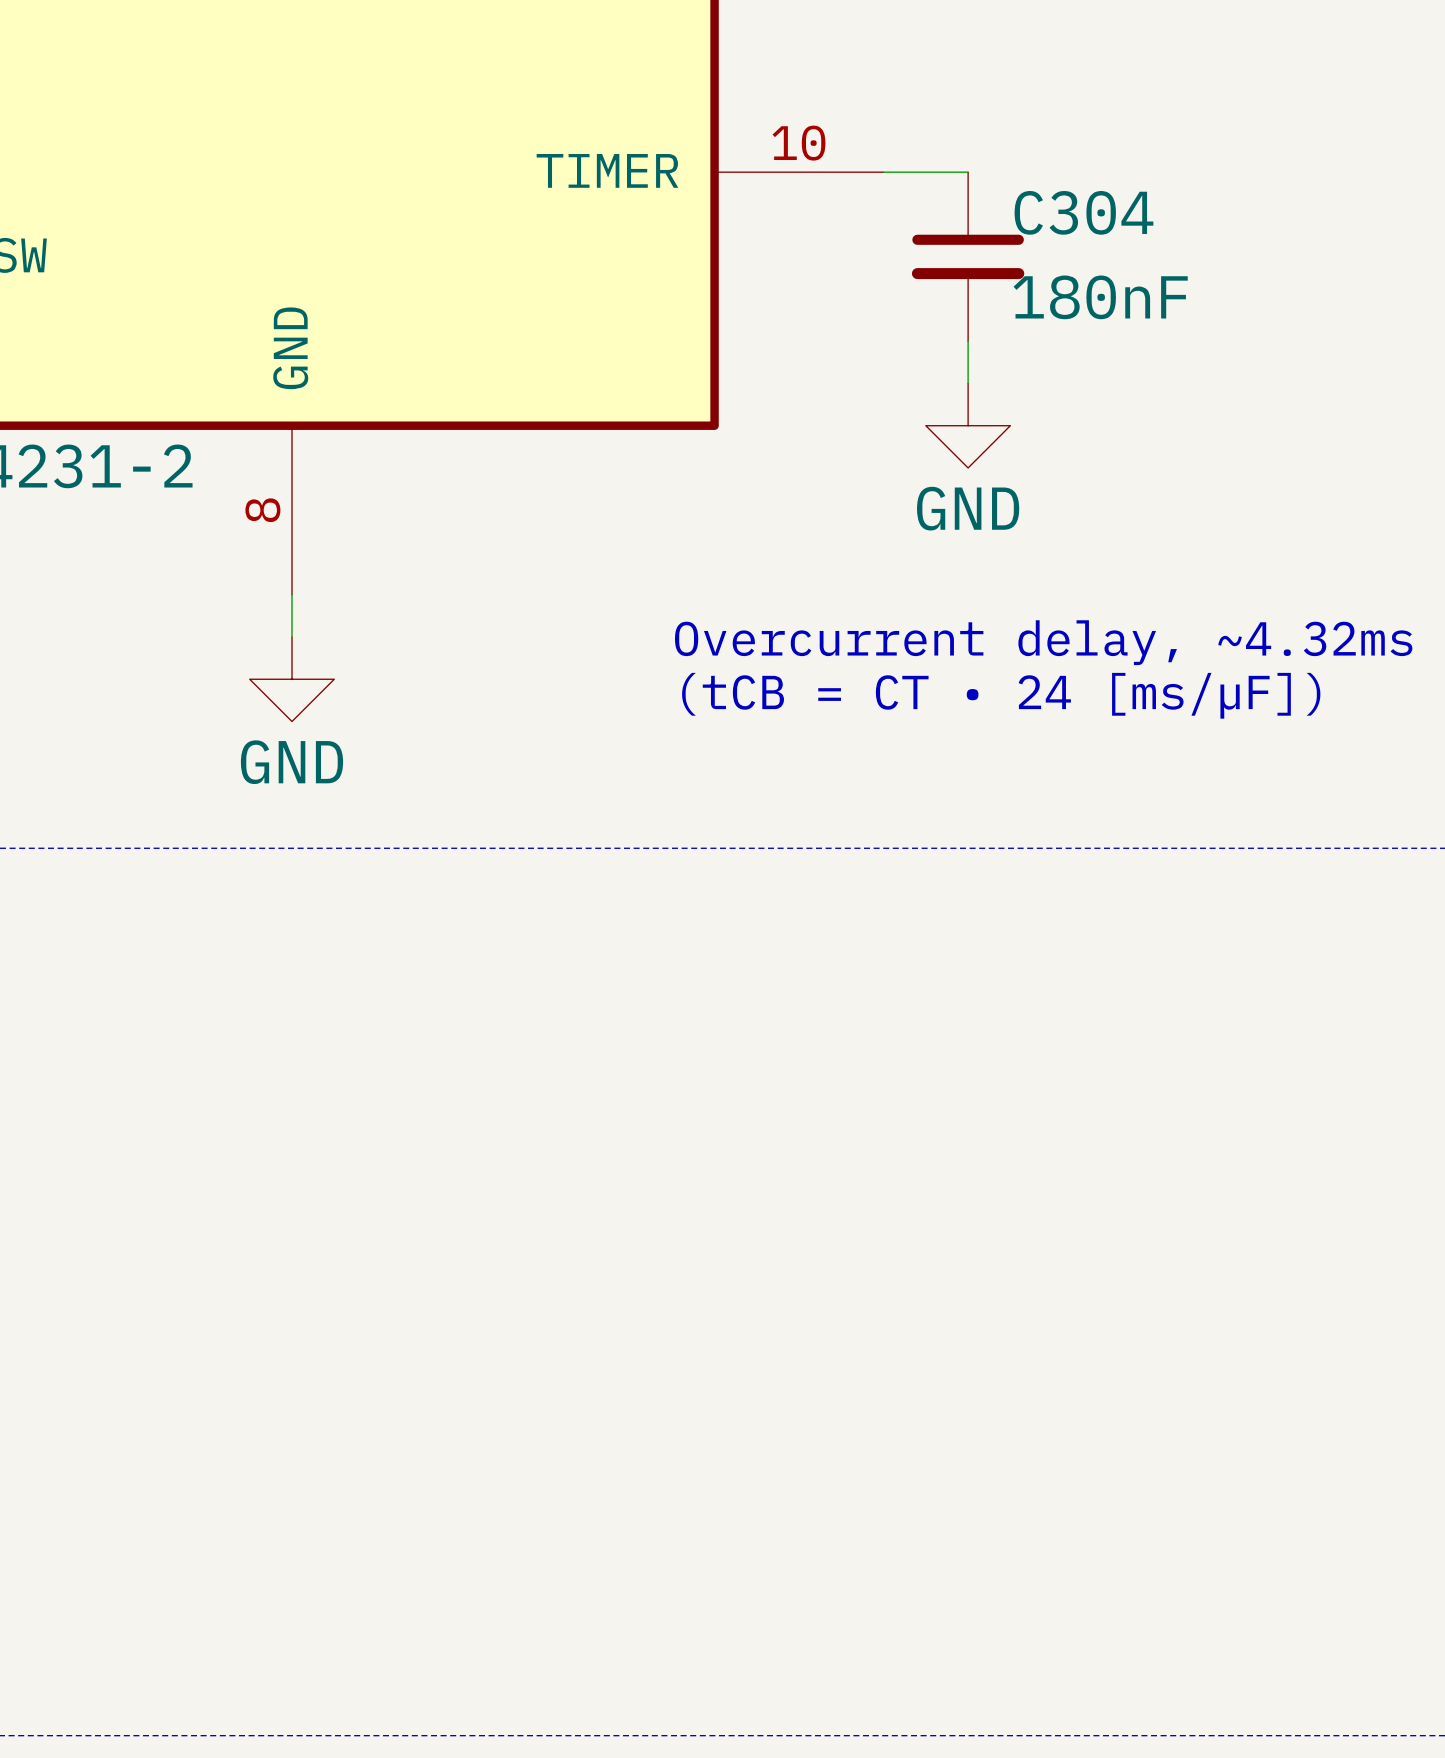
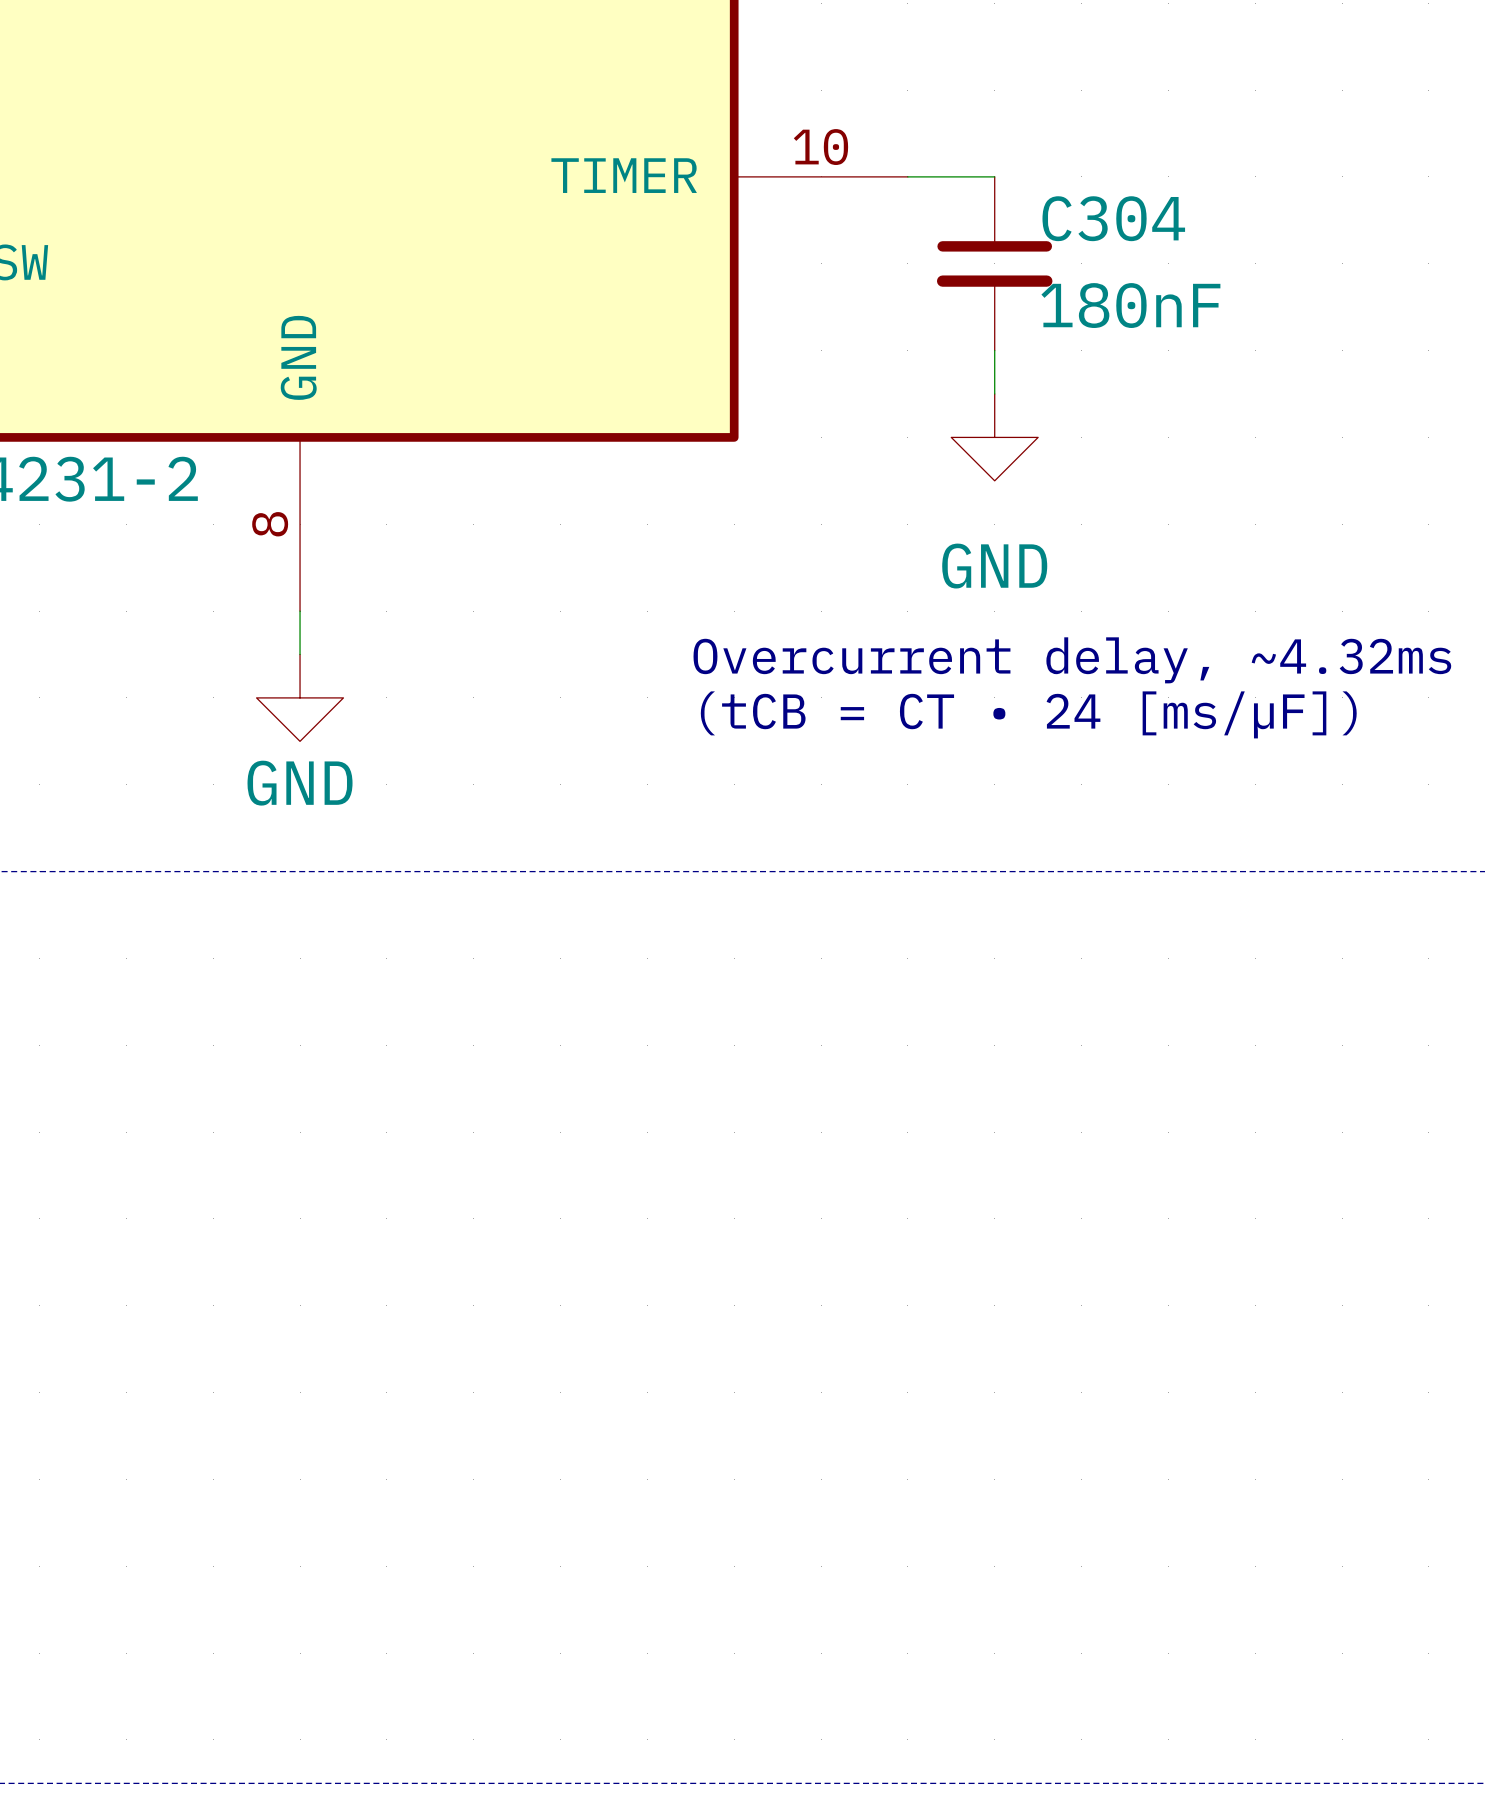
power symbol text position: GND (968, 508) -> GND (994, 566)

